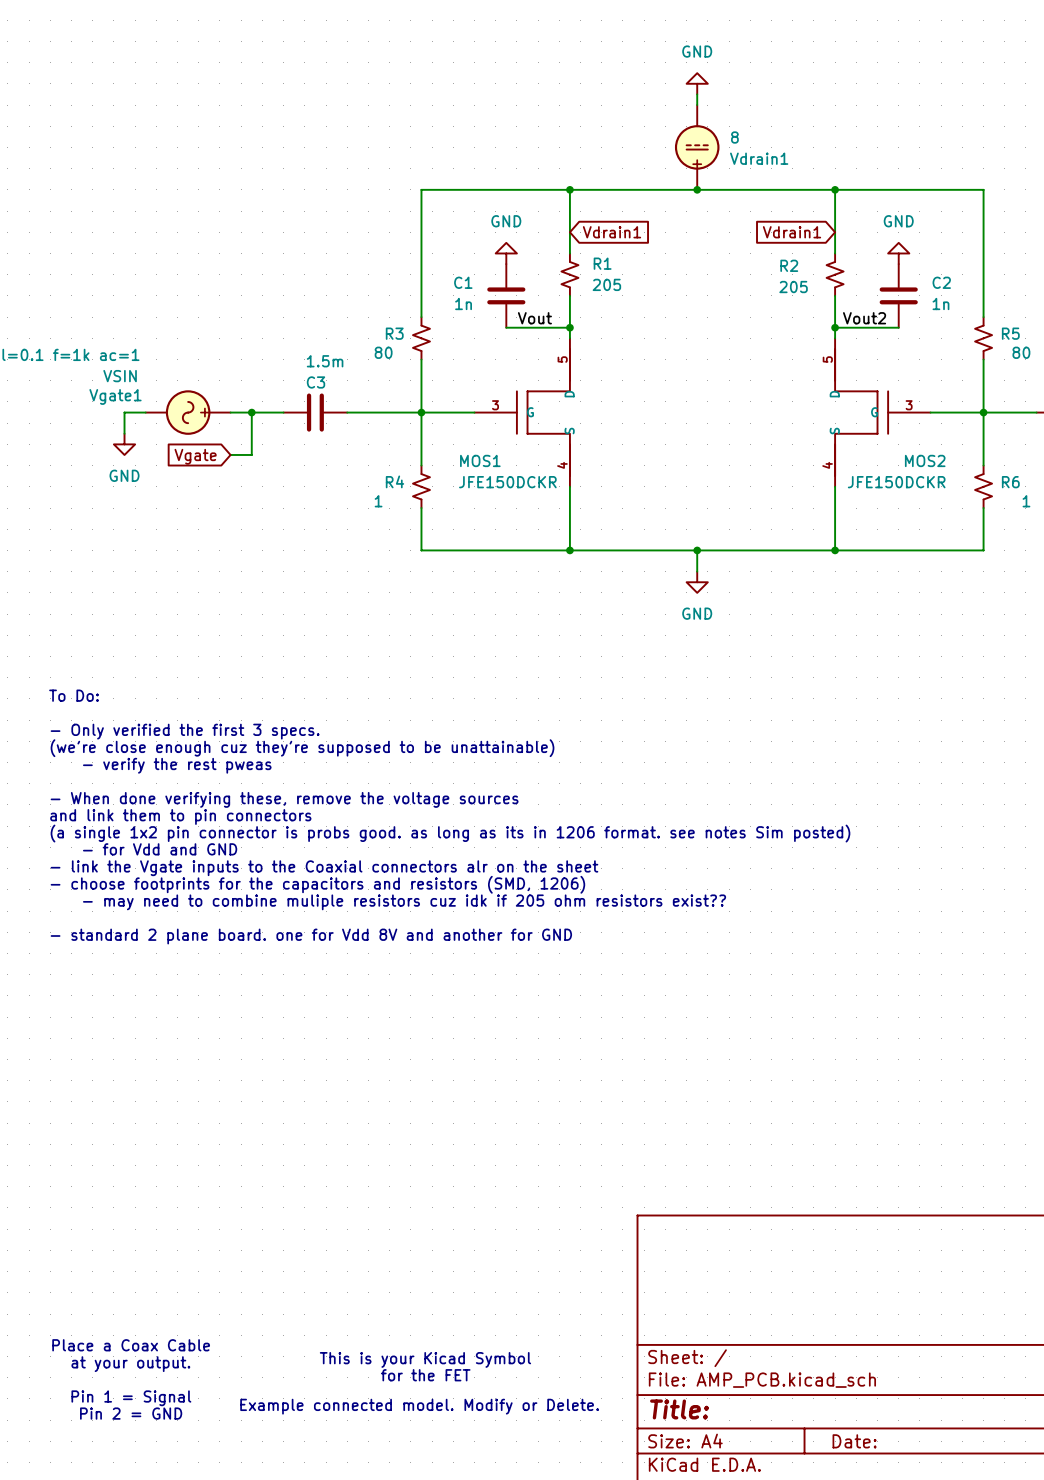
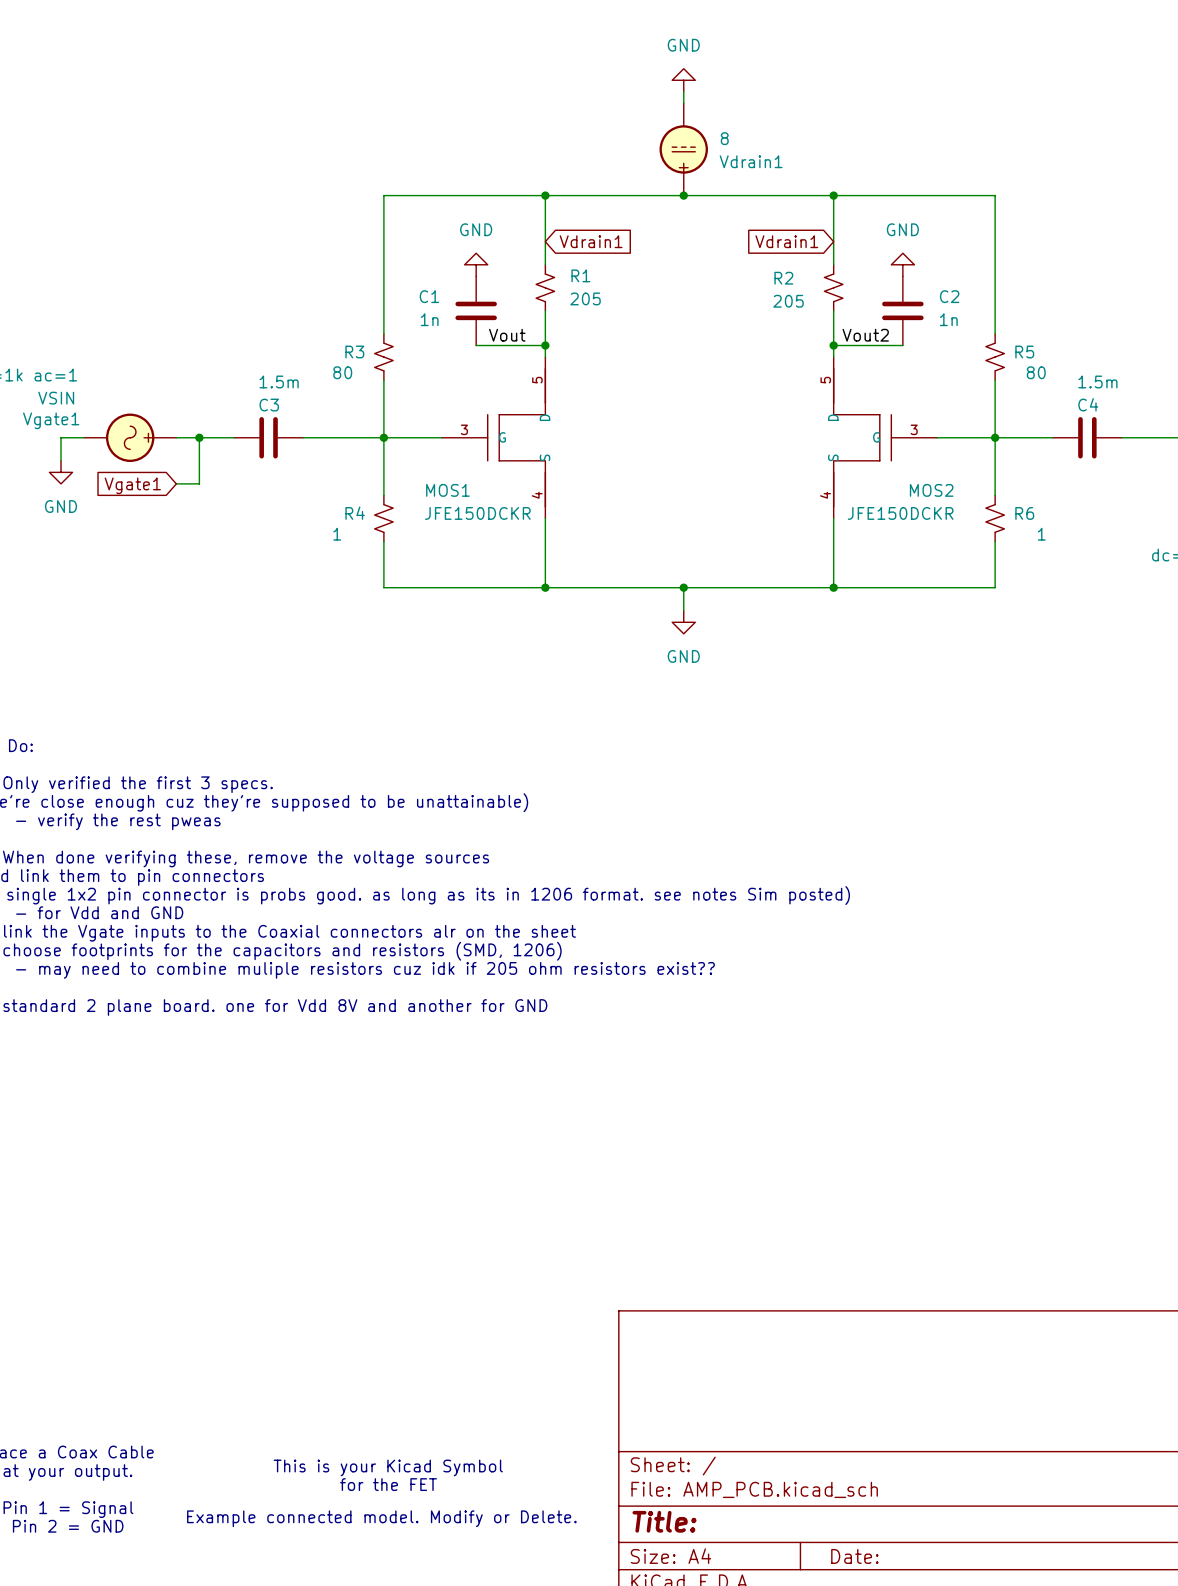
global label: Vgate (195, 456) -> Vgate1 (132, 485)

